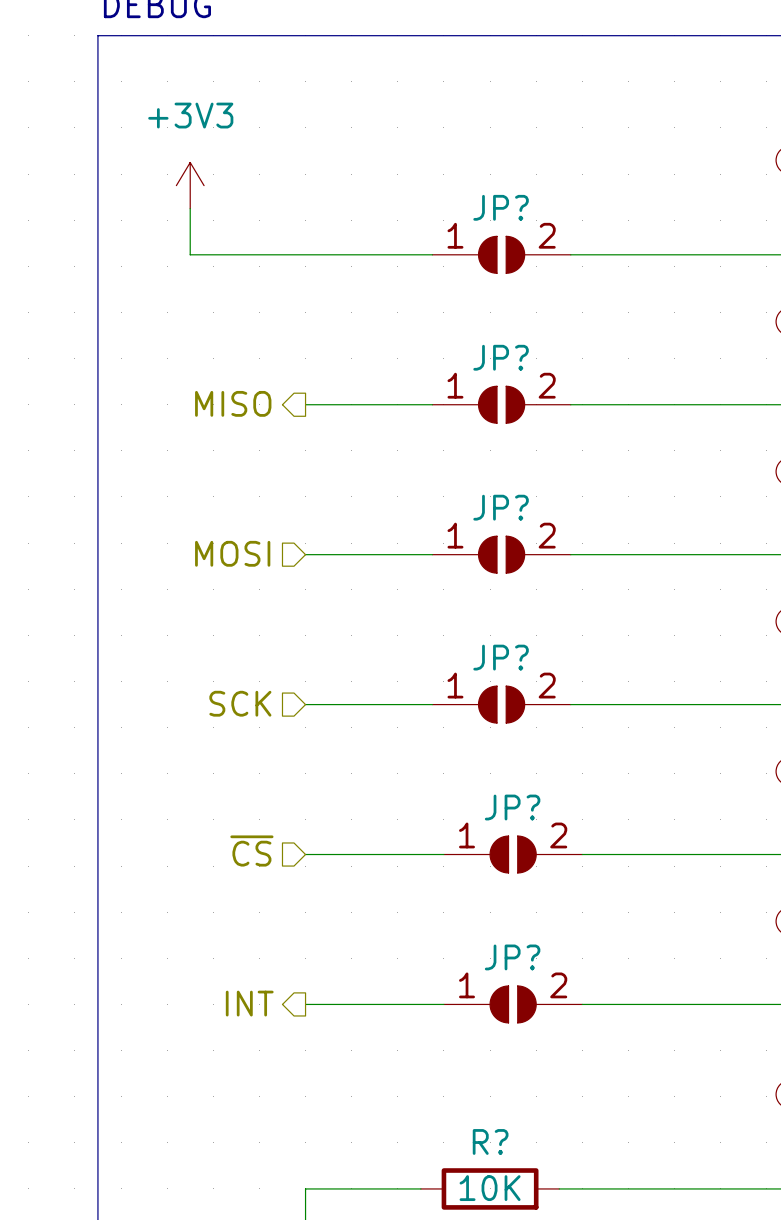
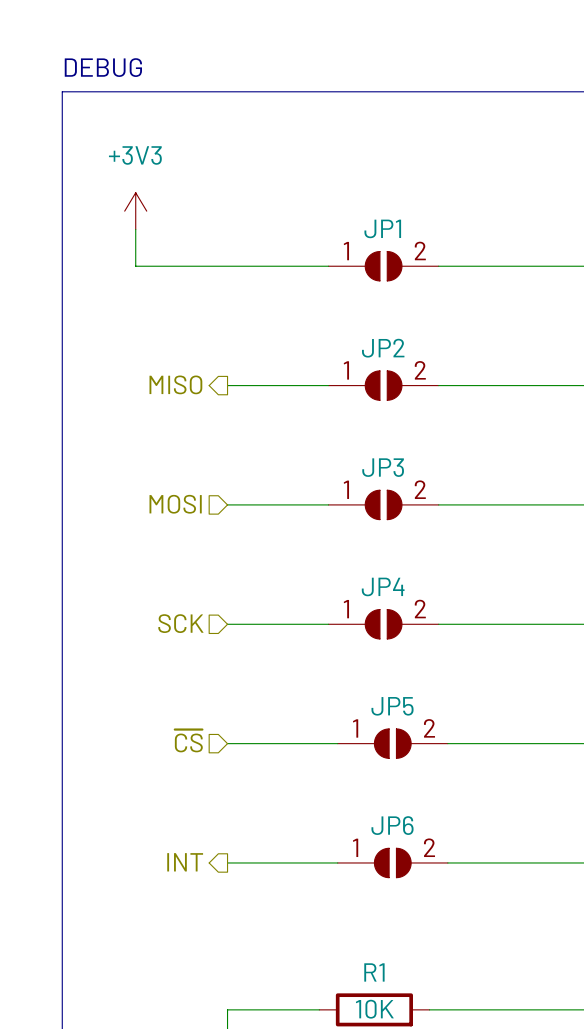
JP? name: JP? (501, 207) -> JP1 (382, 228)
JP? name: JP? (501, 357) -> JP2 (383, 348)
JP? name: JP? (501, 507) -> JP3 (383, 467)
JP? name: JP? (501, 657) -> JP4 (383, 586)
JP? name: JP? (512, 807) -> JP5 (392, 706)
JP? name: JP? (512, 957) -> JP6 (392, 825)
R? name: R? (490, 1141) -> R1 (374, 972)

